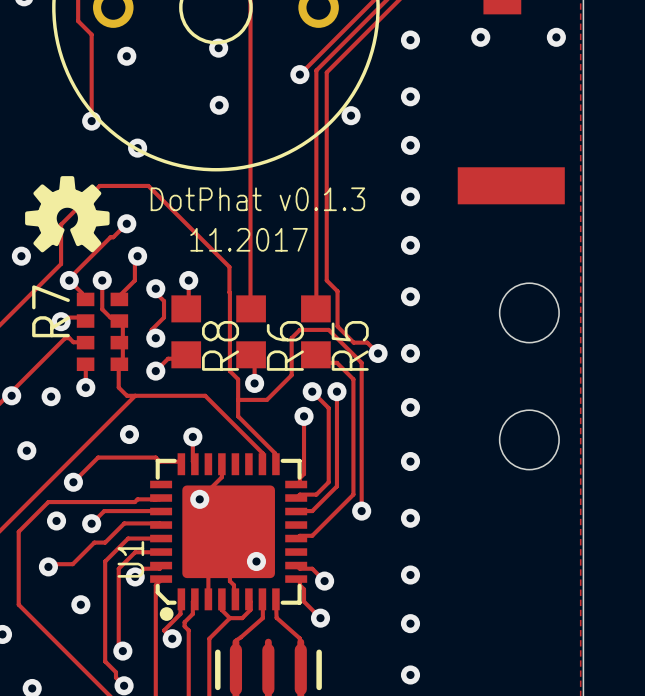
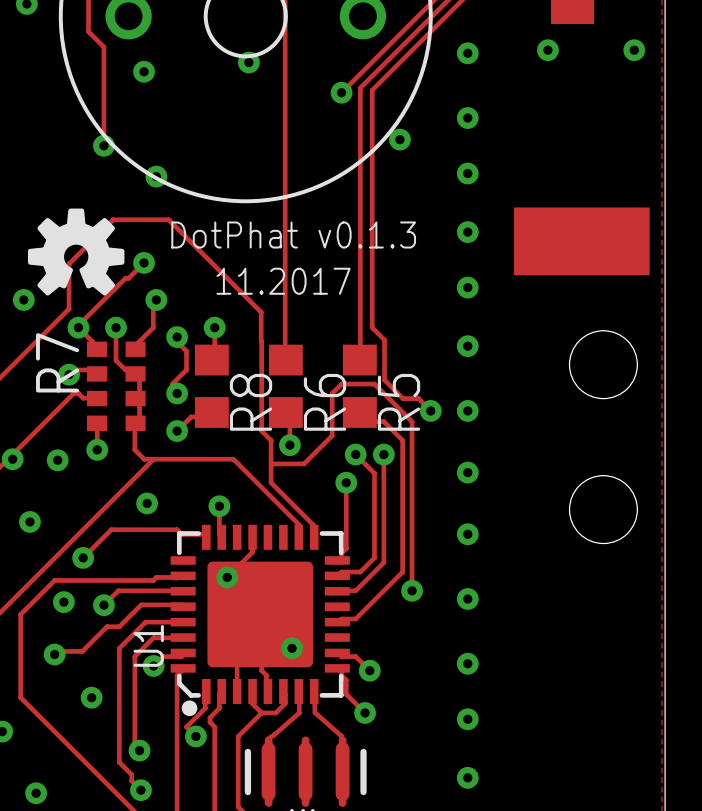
via: (219, 105) -> none
drawing shape: [457, 167, 565, 205] -> [514, 207, 650, 276]

